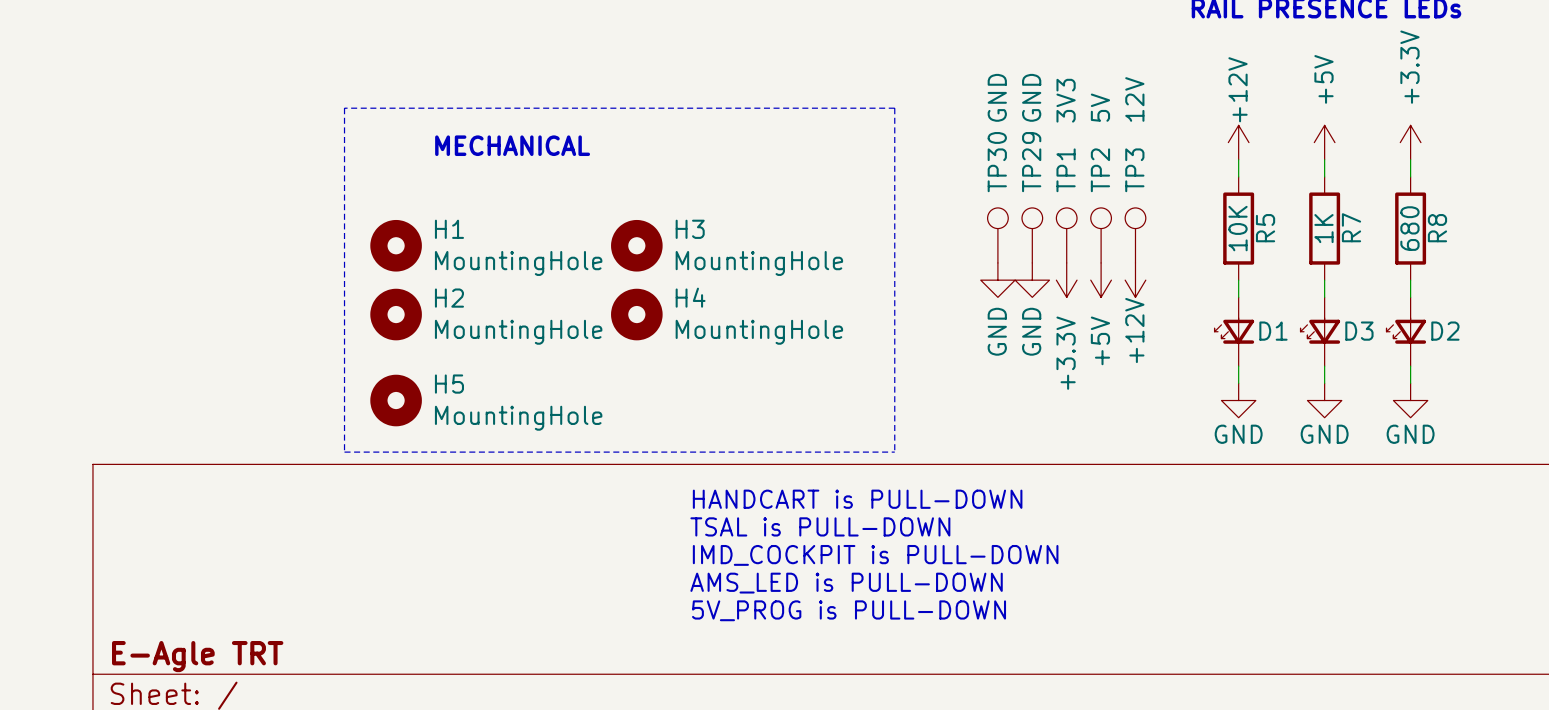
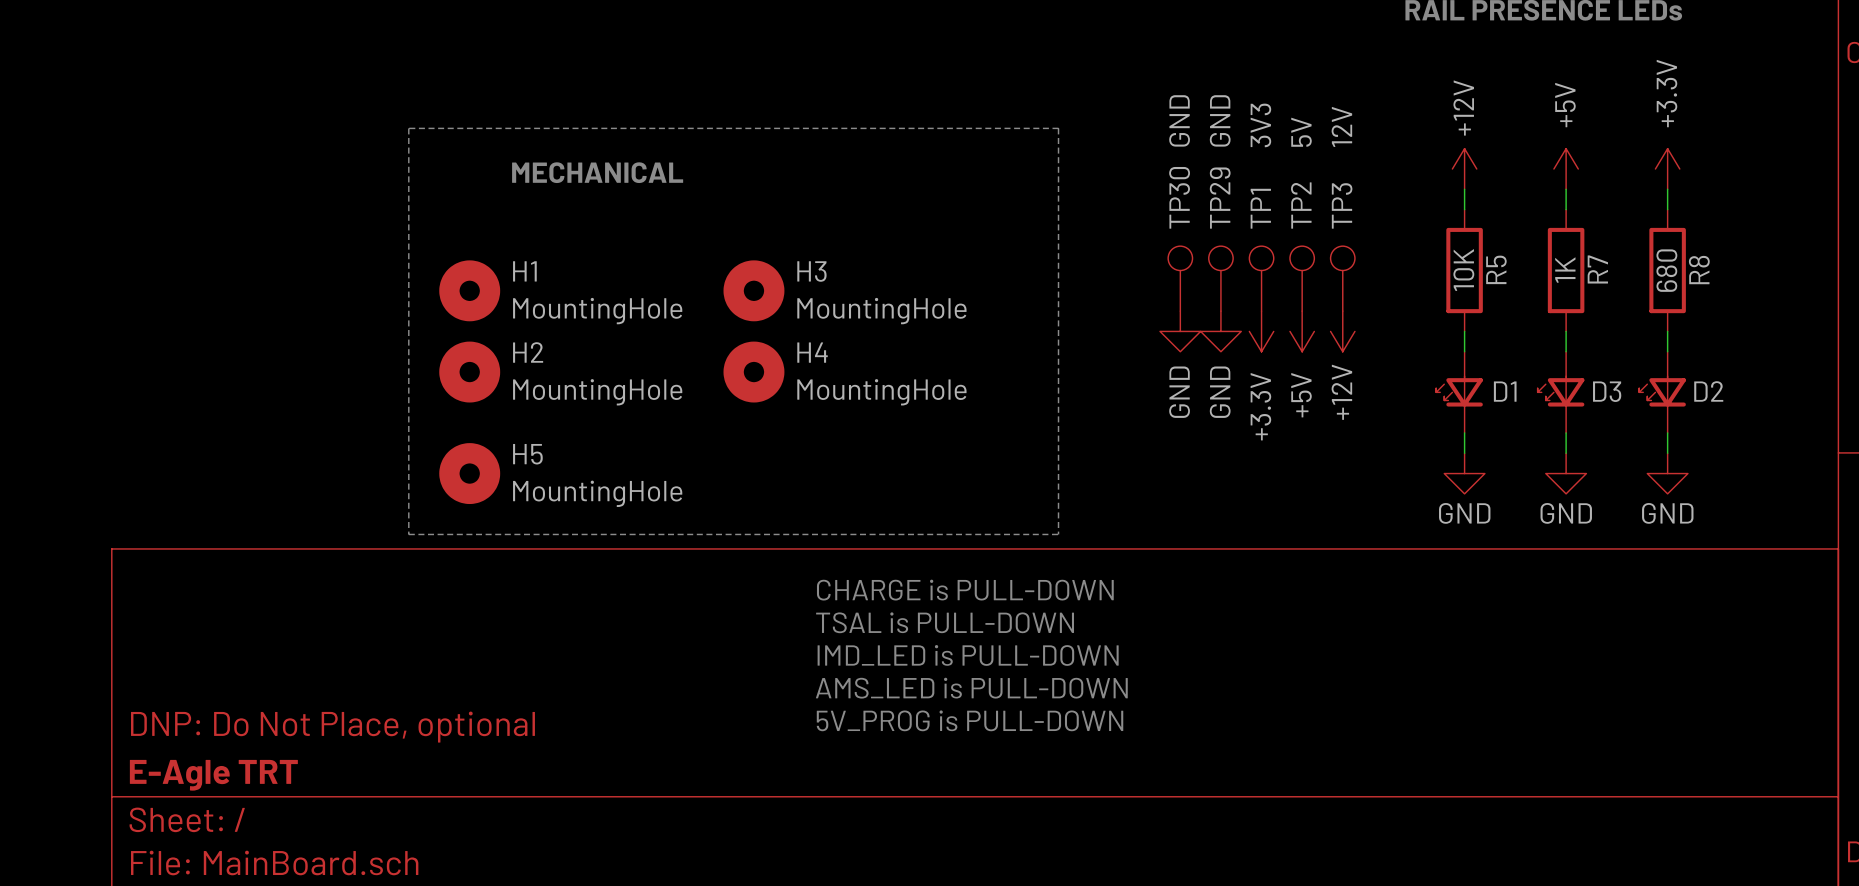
text: HANDCART is PULL-DOWN (857, 499) -> CHARGE is PULL-DOWN (965, 590)
text: IMD_COCKPIT is PULL-DOWN (875, 555) -> IMD_LED is PULL-DOWN (968, 655)
title block: none -> DNP: Do Not Place, optional (332, 727)

